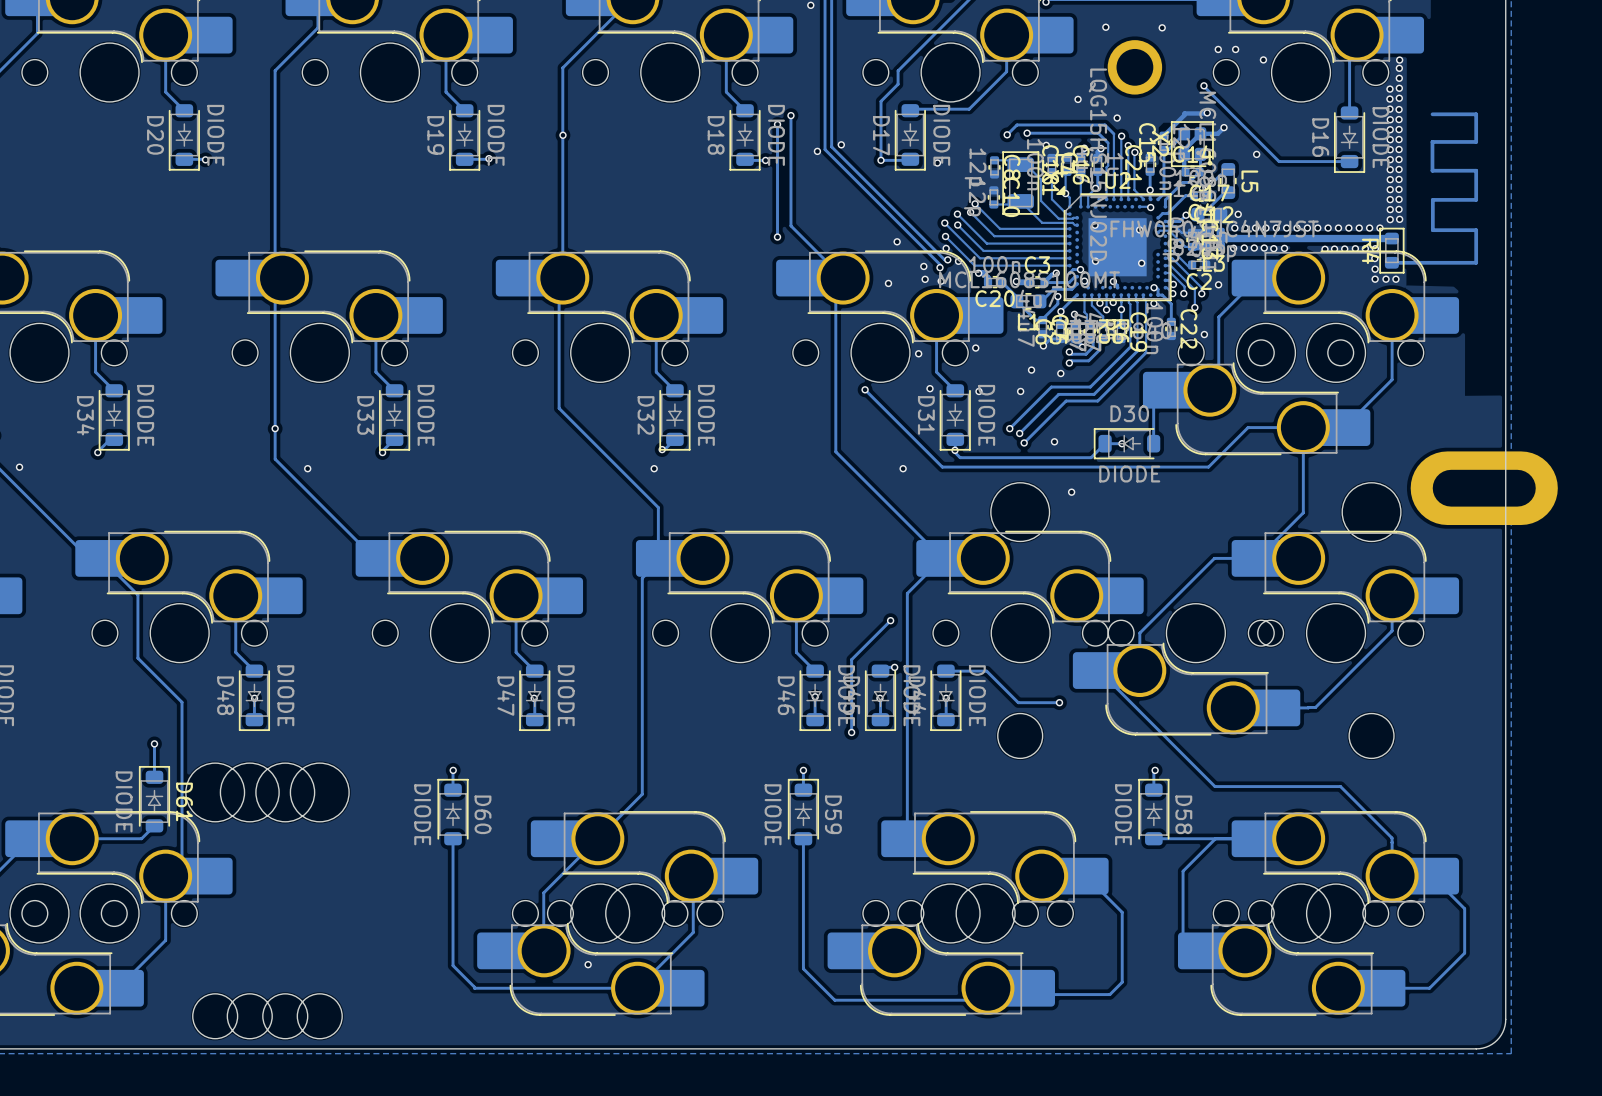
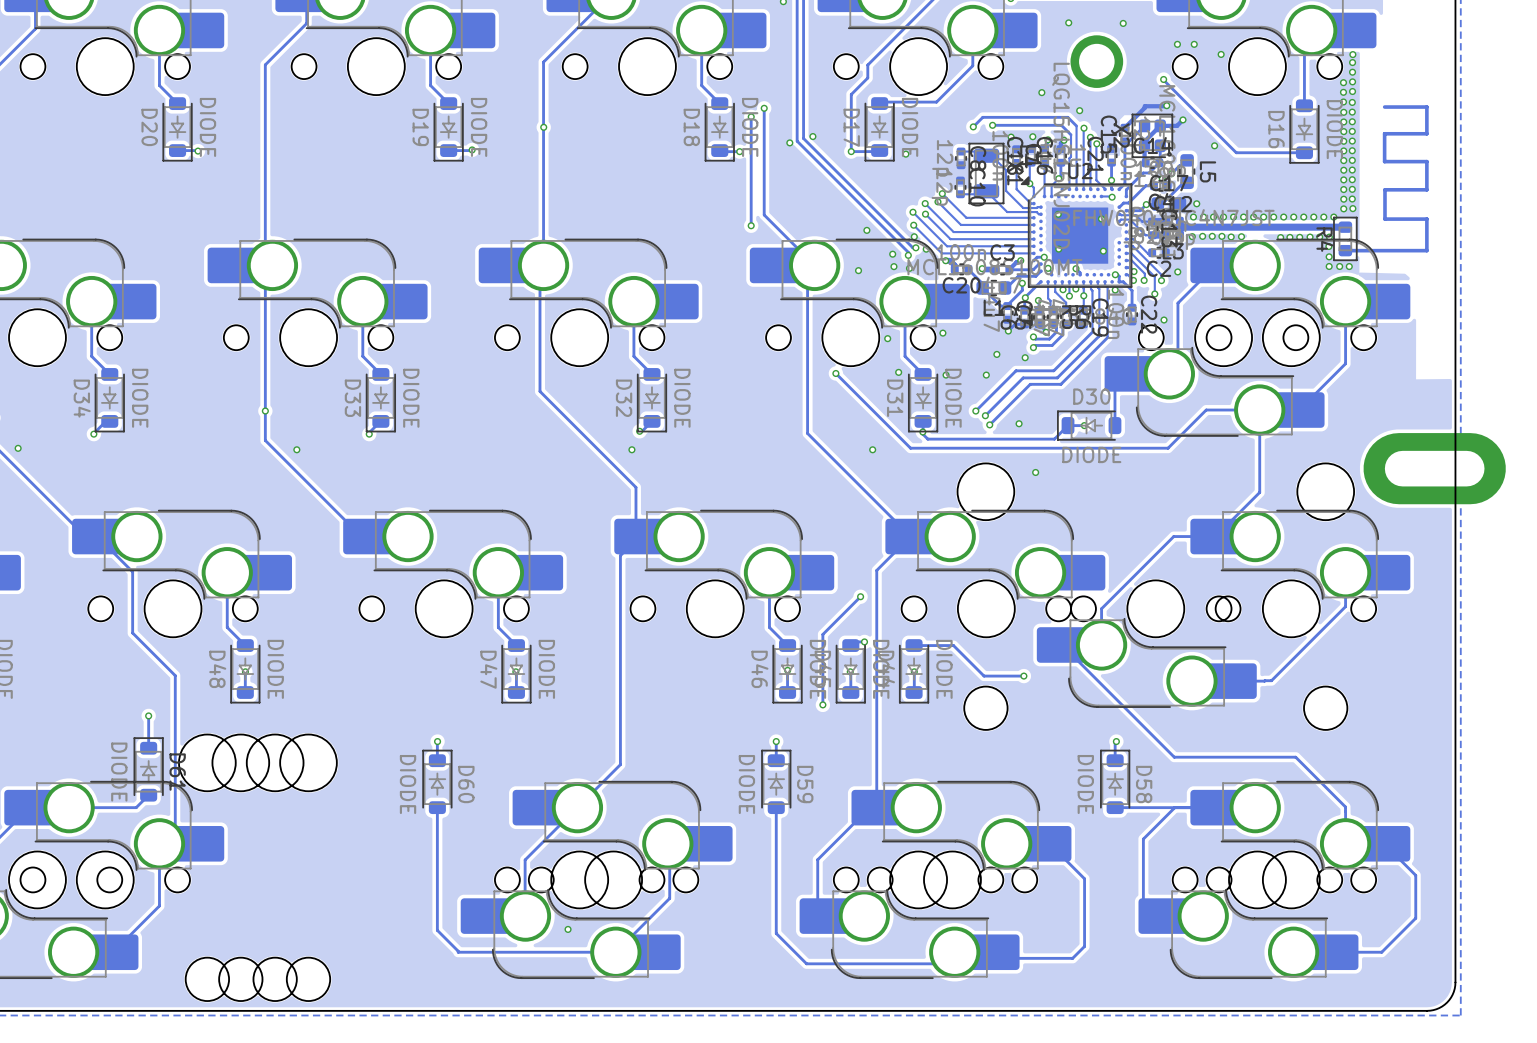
track: none -> (869, 807) (817, 859) (817, 908)

